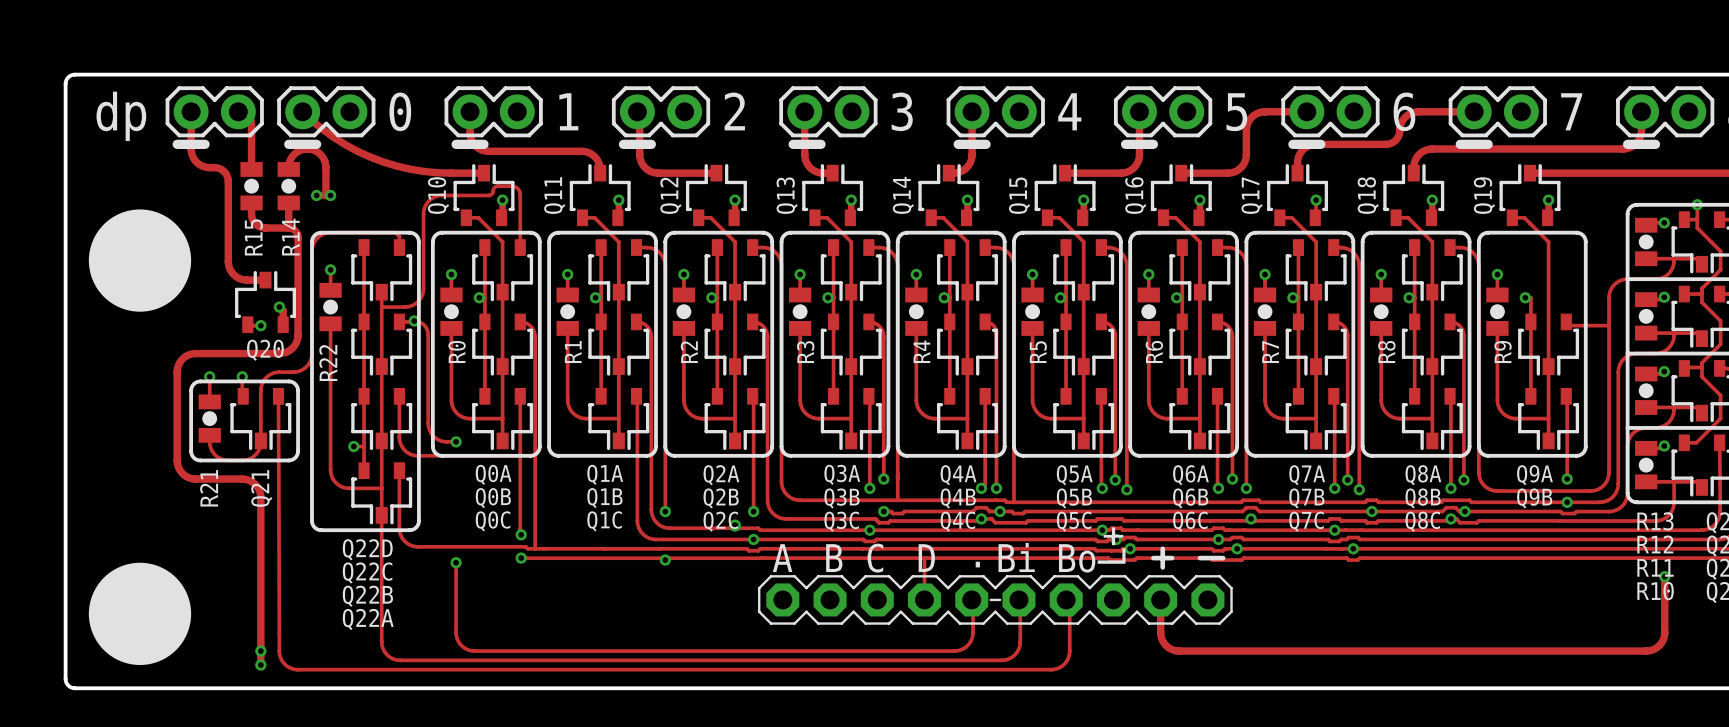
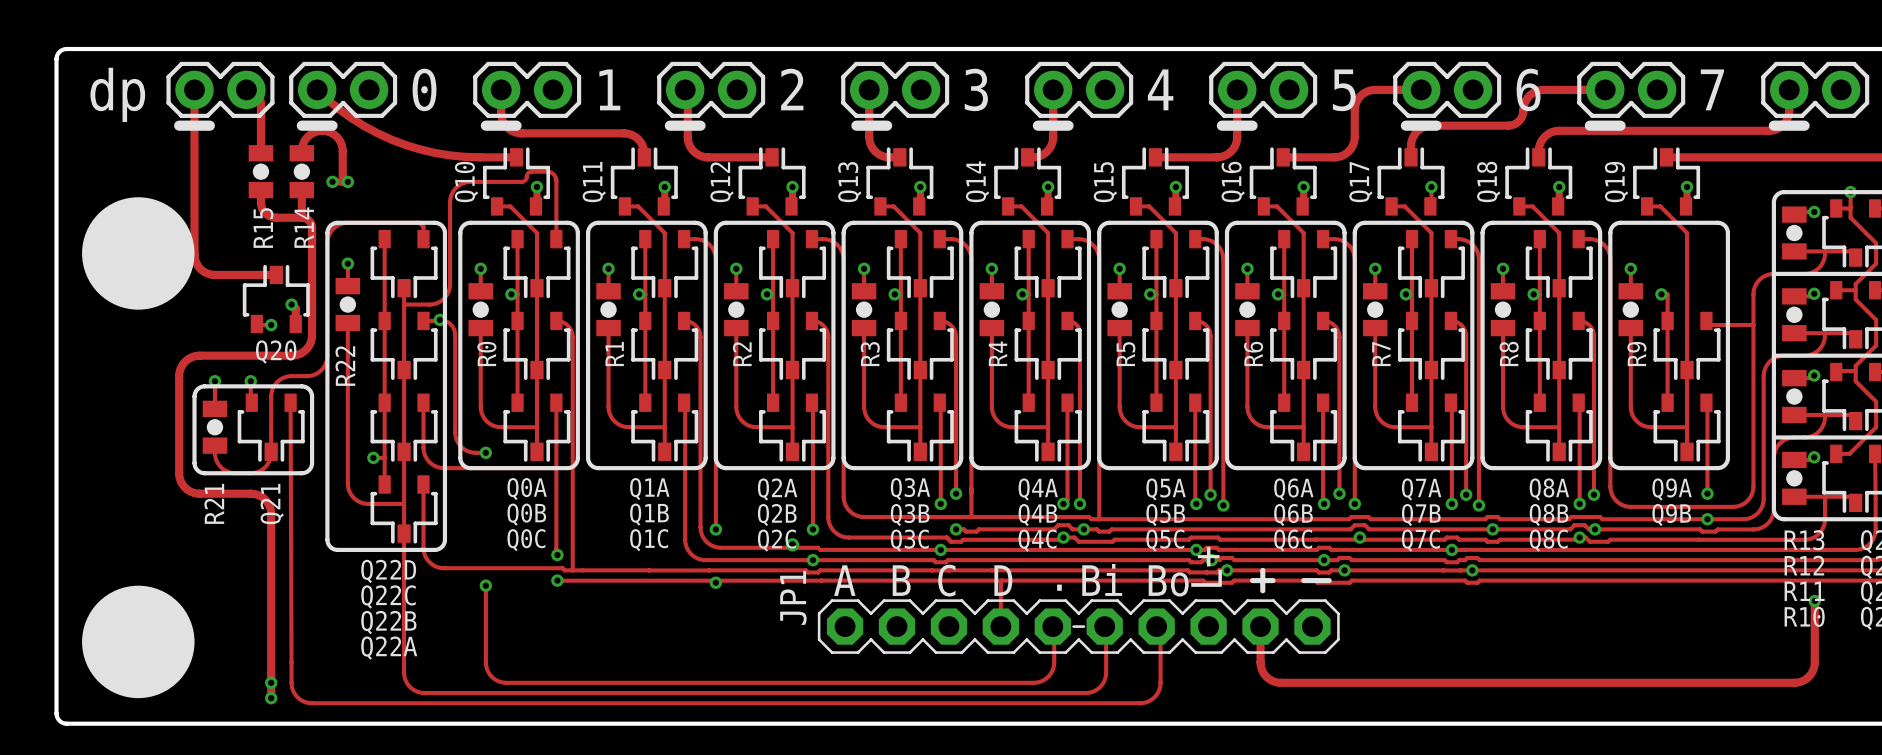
track: (191, 149) (192, 156) (198, 163) (204, 166) (219, 168) (227, 176) (228, 263) (235, 276) (246, 280) -> (194, 130) (196, 262) (202, 270) (209, 274) (255, 274)
JP1 name: none -> JP1 (793, 597)

